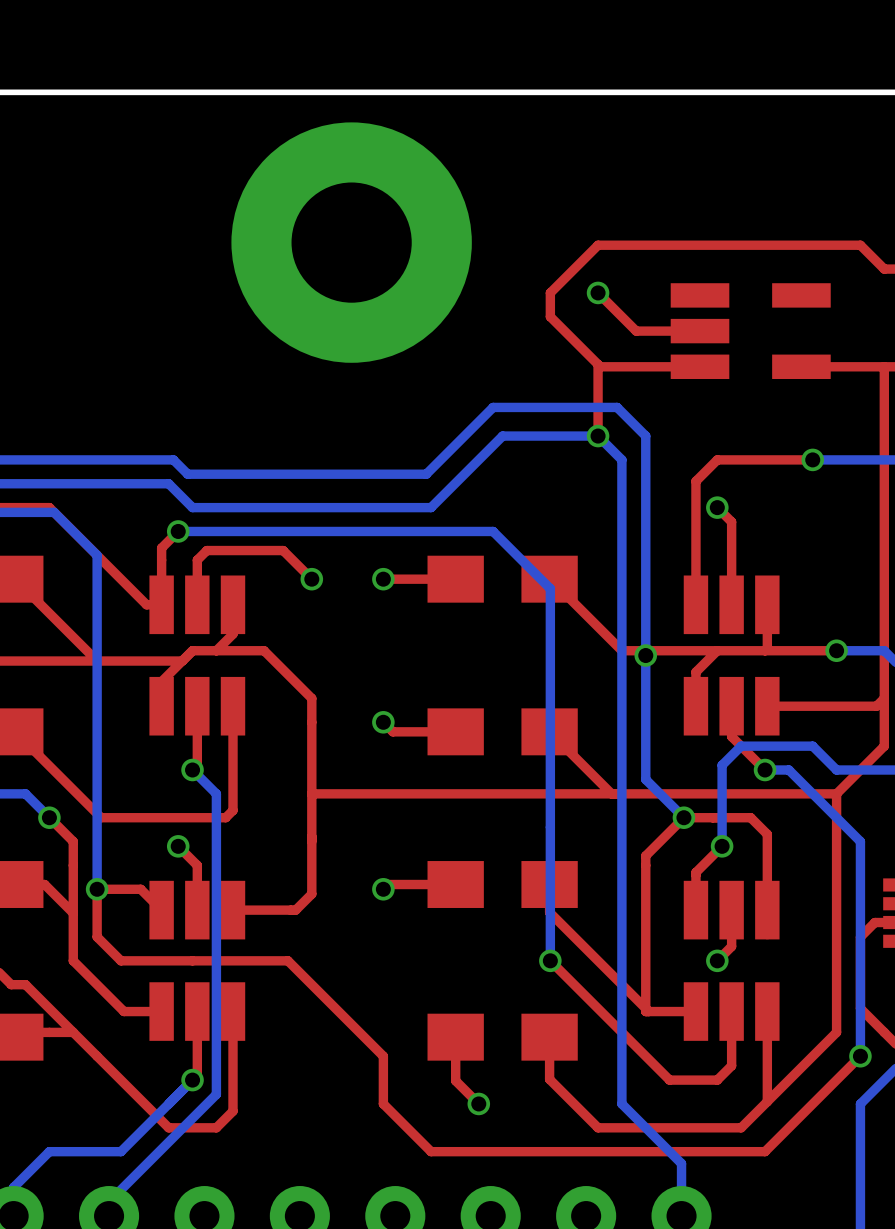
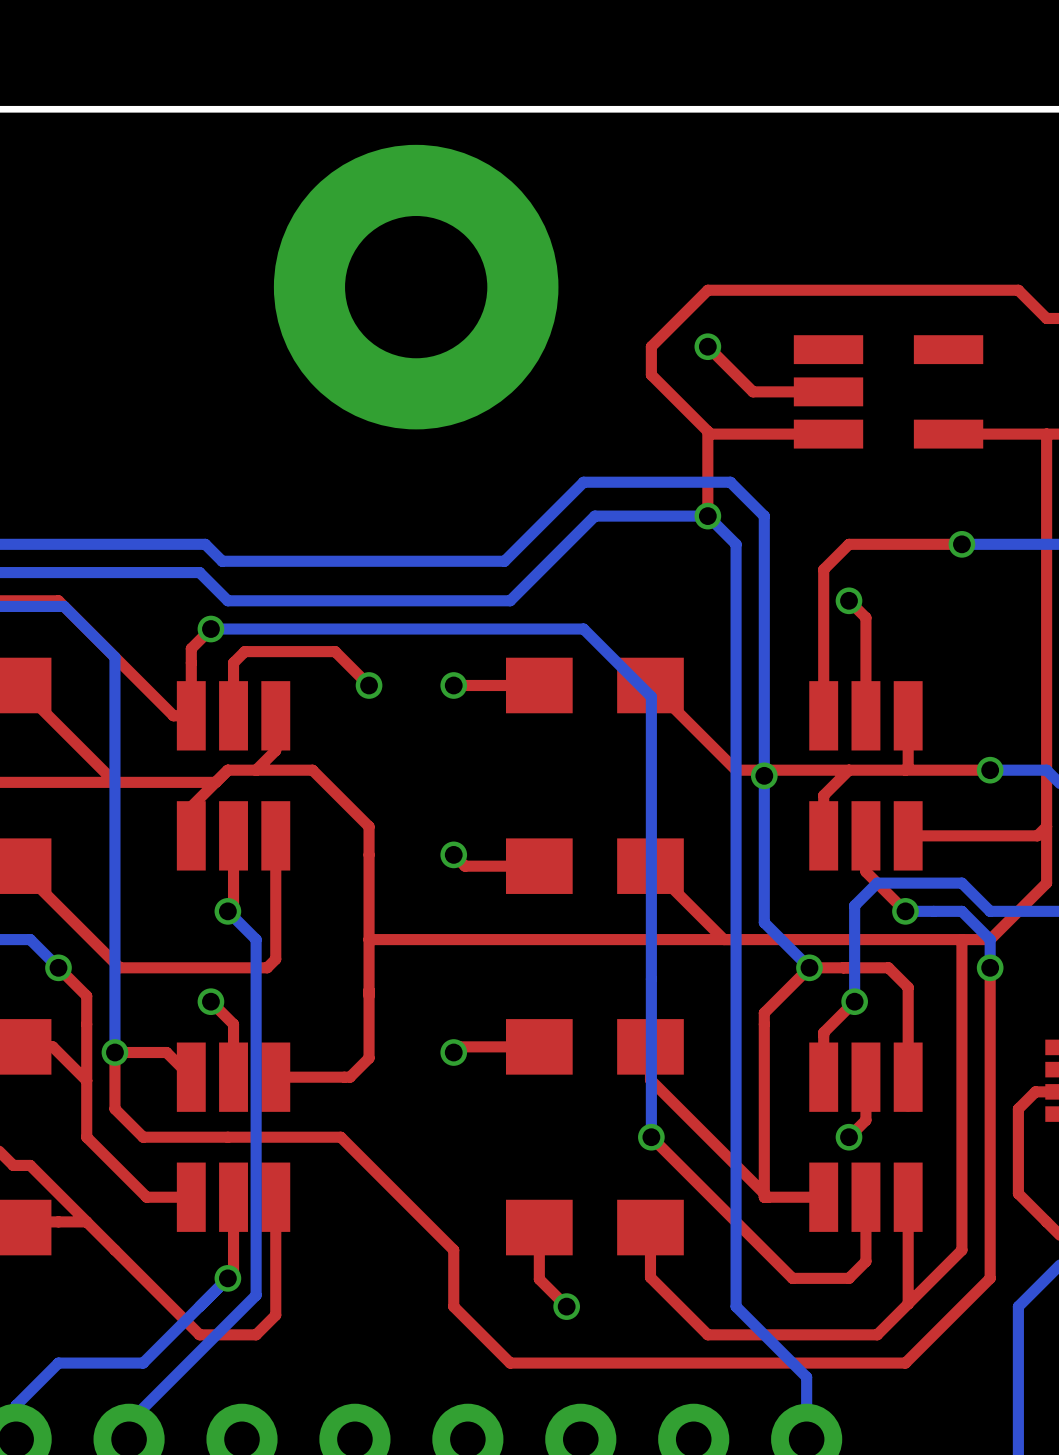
bottom track: (788, 770) (860, 841) (860, 1056) -> (933, 911) (961, 911) (990, 939) (990, 967)
top track: none -> (961, 939) (961, 1250)
top track: (836, 793) (836, 817) -> none
via: none -> (990, 967)
top track: (836, 1032) (812, 1056) -> (990, 1221) (990, 1278)
top track: (860, 1056) (836, 1080) -> none
via: (860, 1056) -> none

